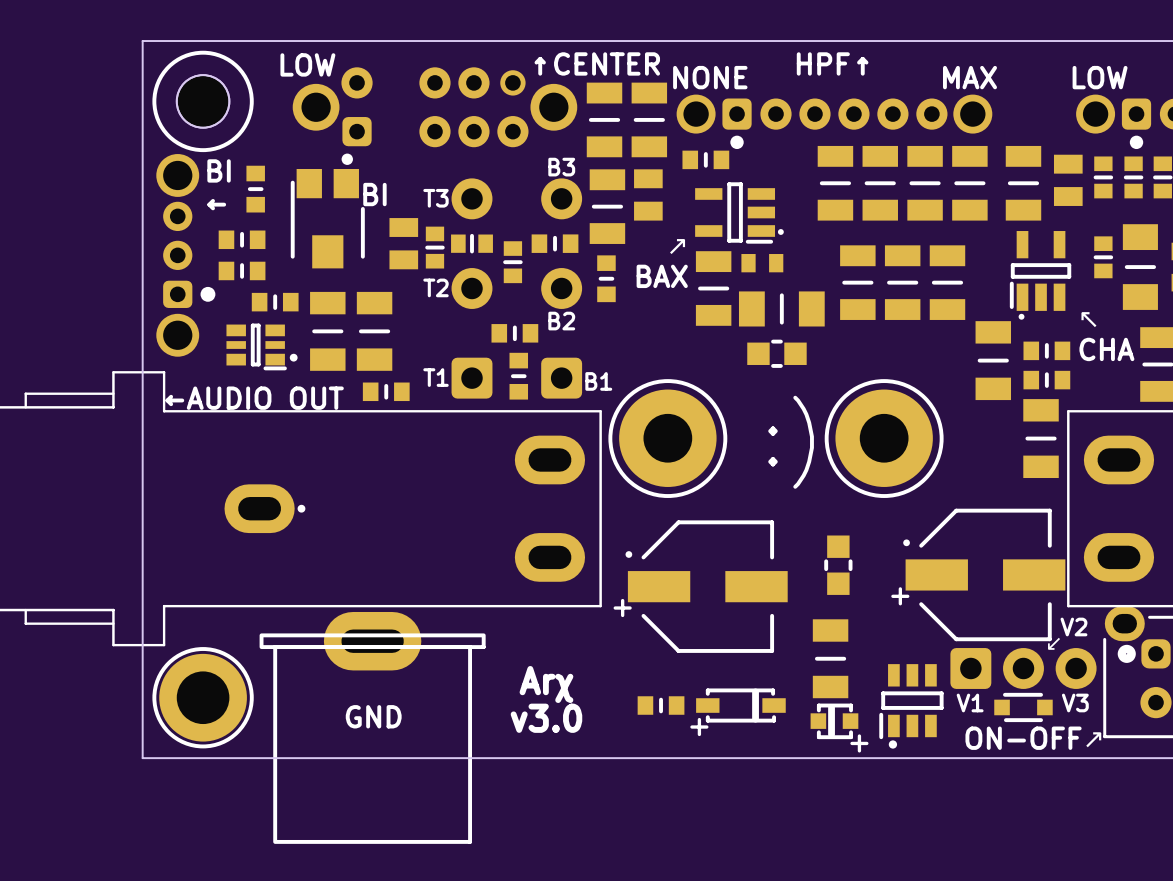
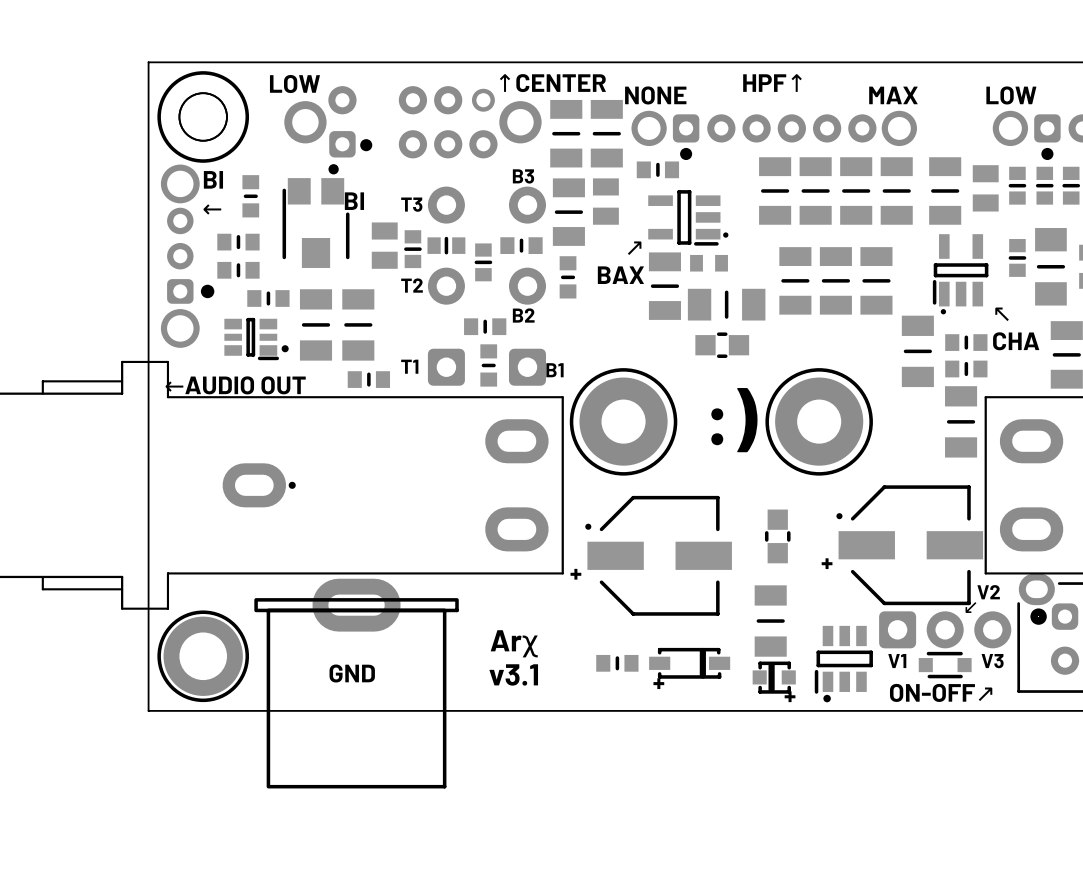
part footprint: [292, 67, 578, 148] -> [284, 86, 542, 159]
text: v3.0 (546, 718) -> v3.1 (513, 674)

